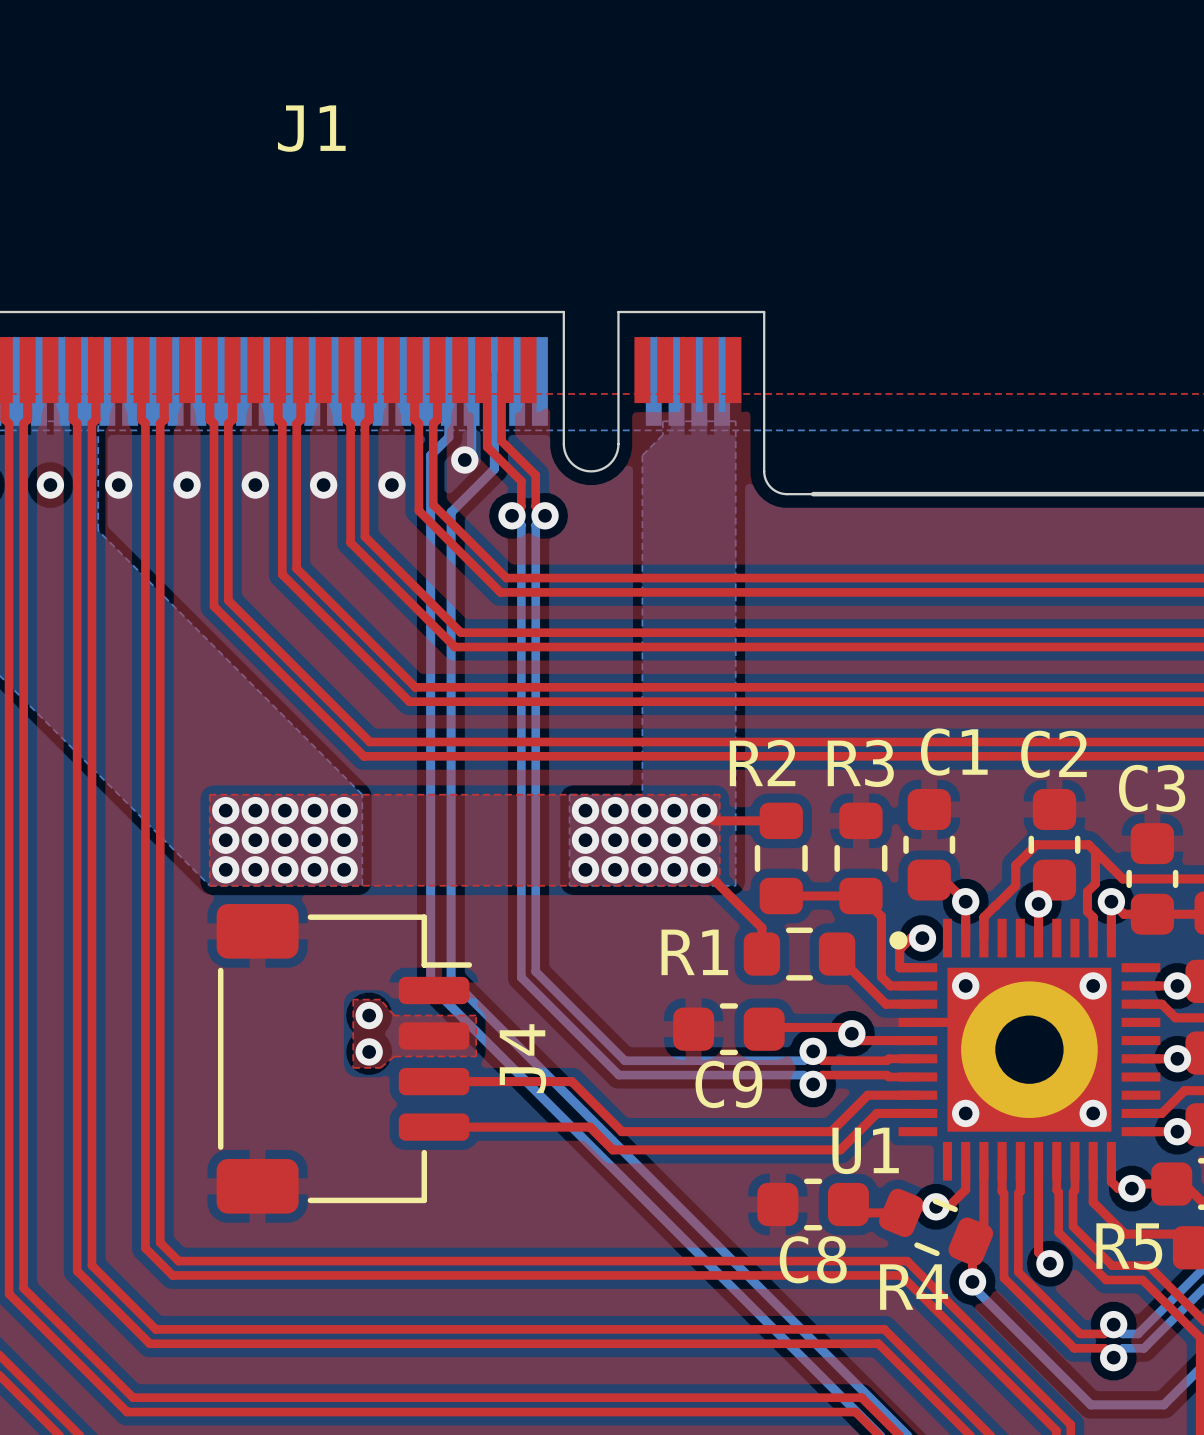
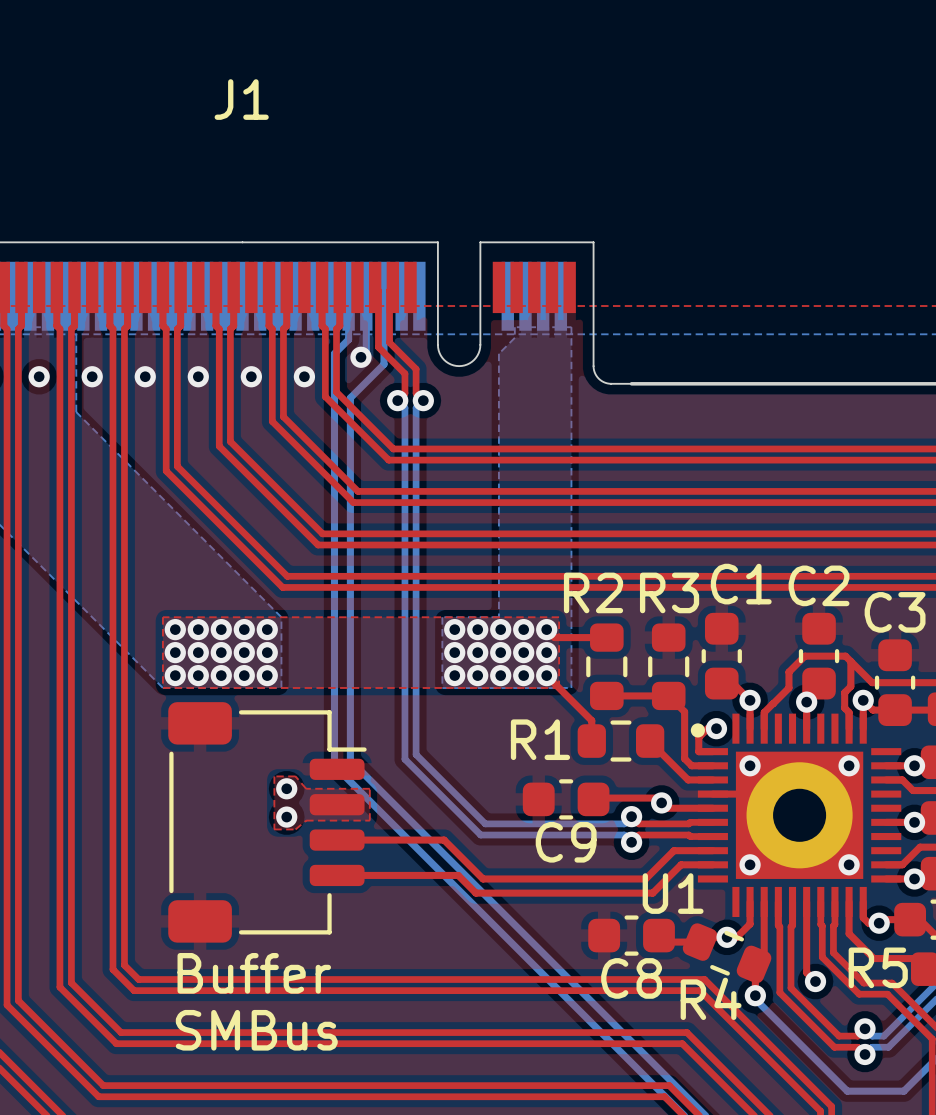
J4 name: J4 (522, 1058) -> none
text: none -> Buffer (254, 973)
text: none -> SMBus (256, 1030)

